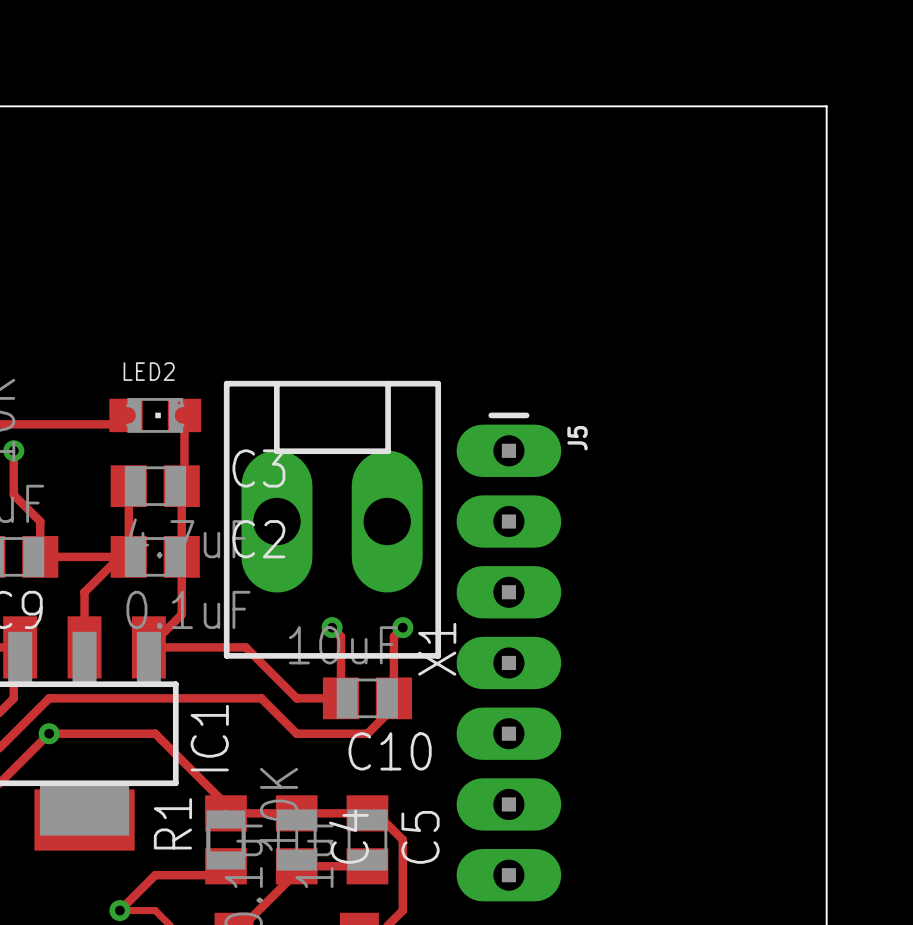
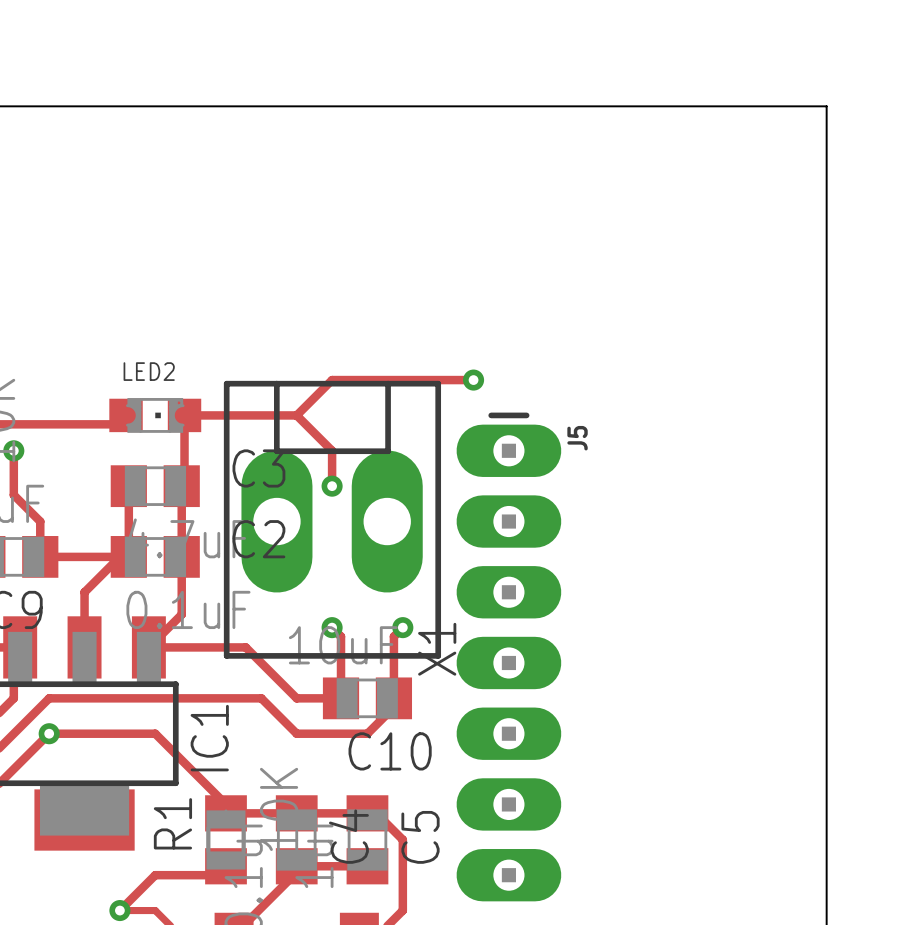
track: none -> (473, 380) (332, 380) (296, 415)
via: none -> (473, 380)
track: none -> (184, 415) (296, 415)
track: none -> (296, 415) (332, 450) (332, 486)
via: none -> (332, 486)

